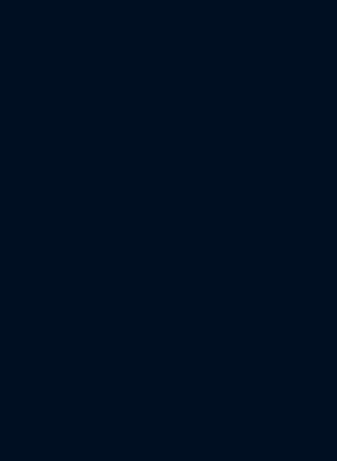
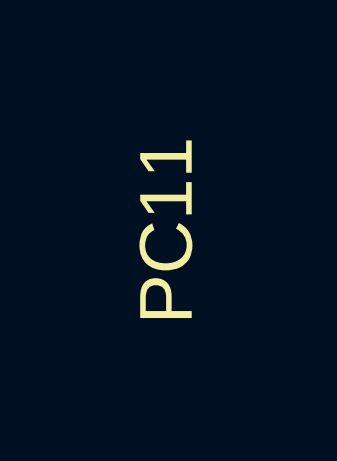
text: none -> PC11 (165, 229)

